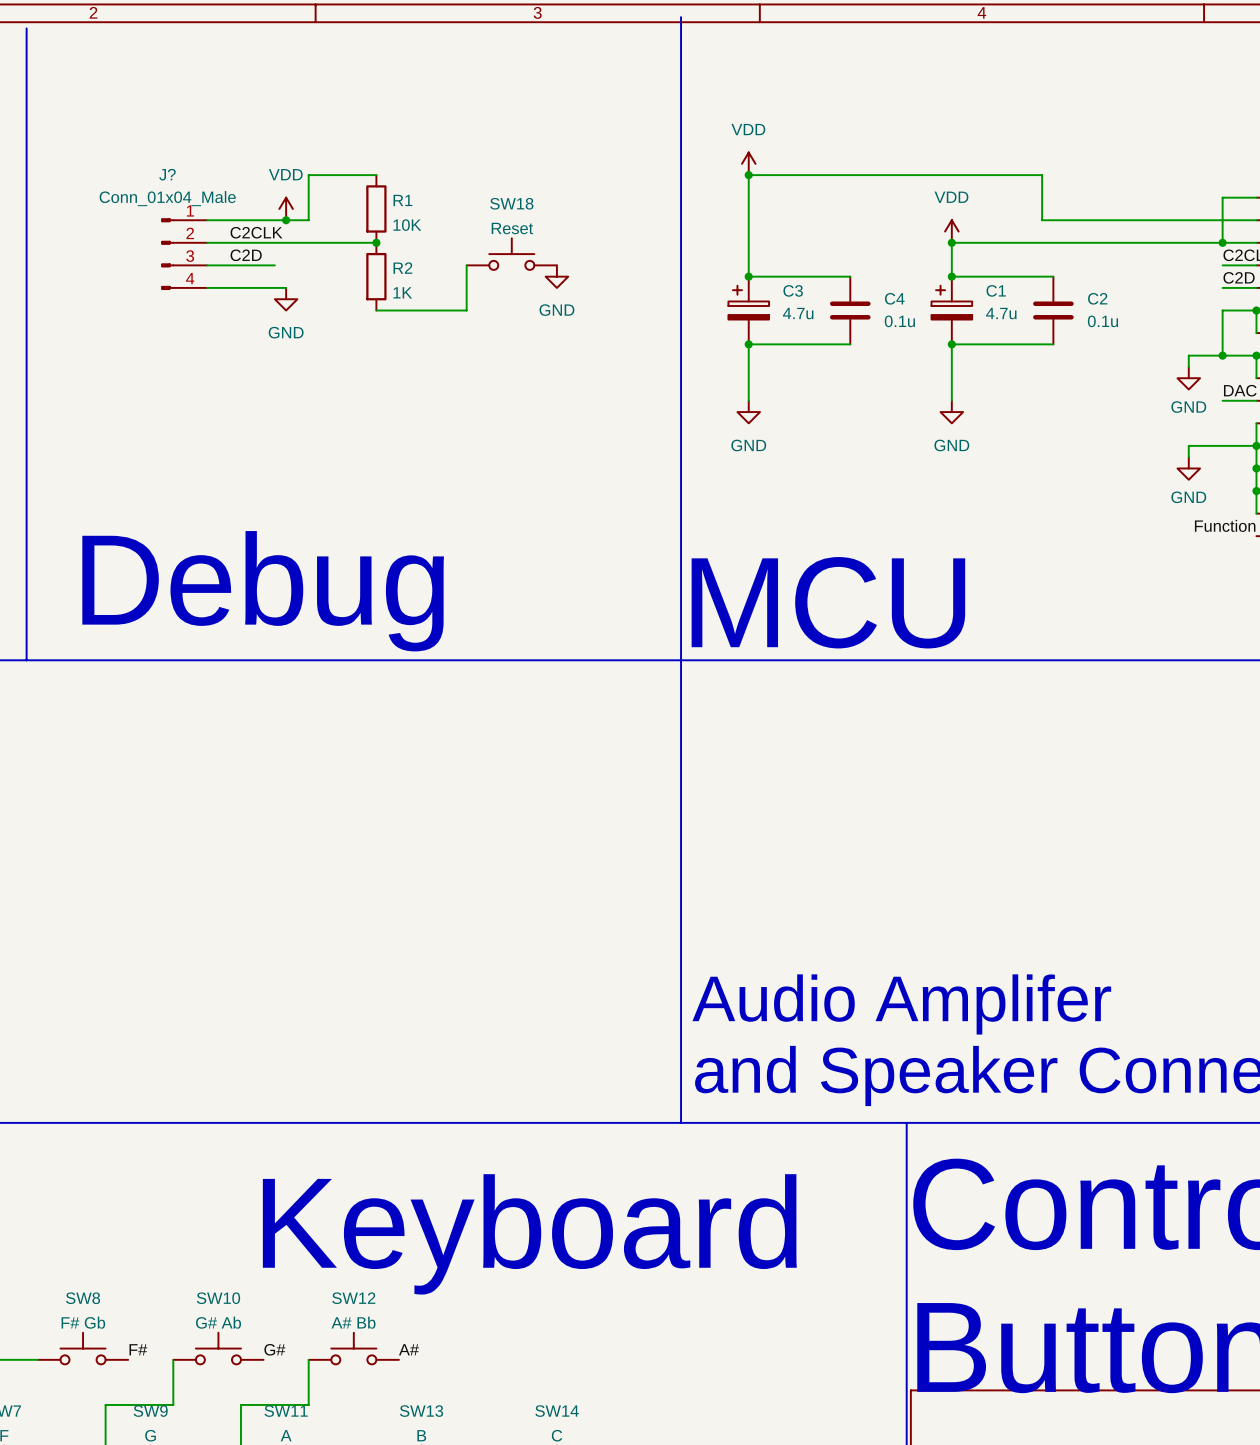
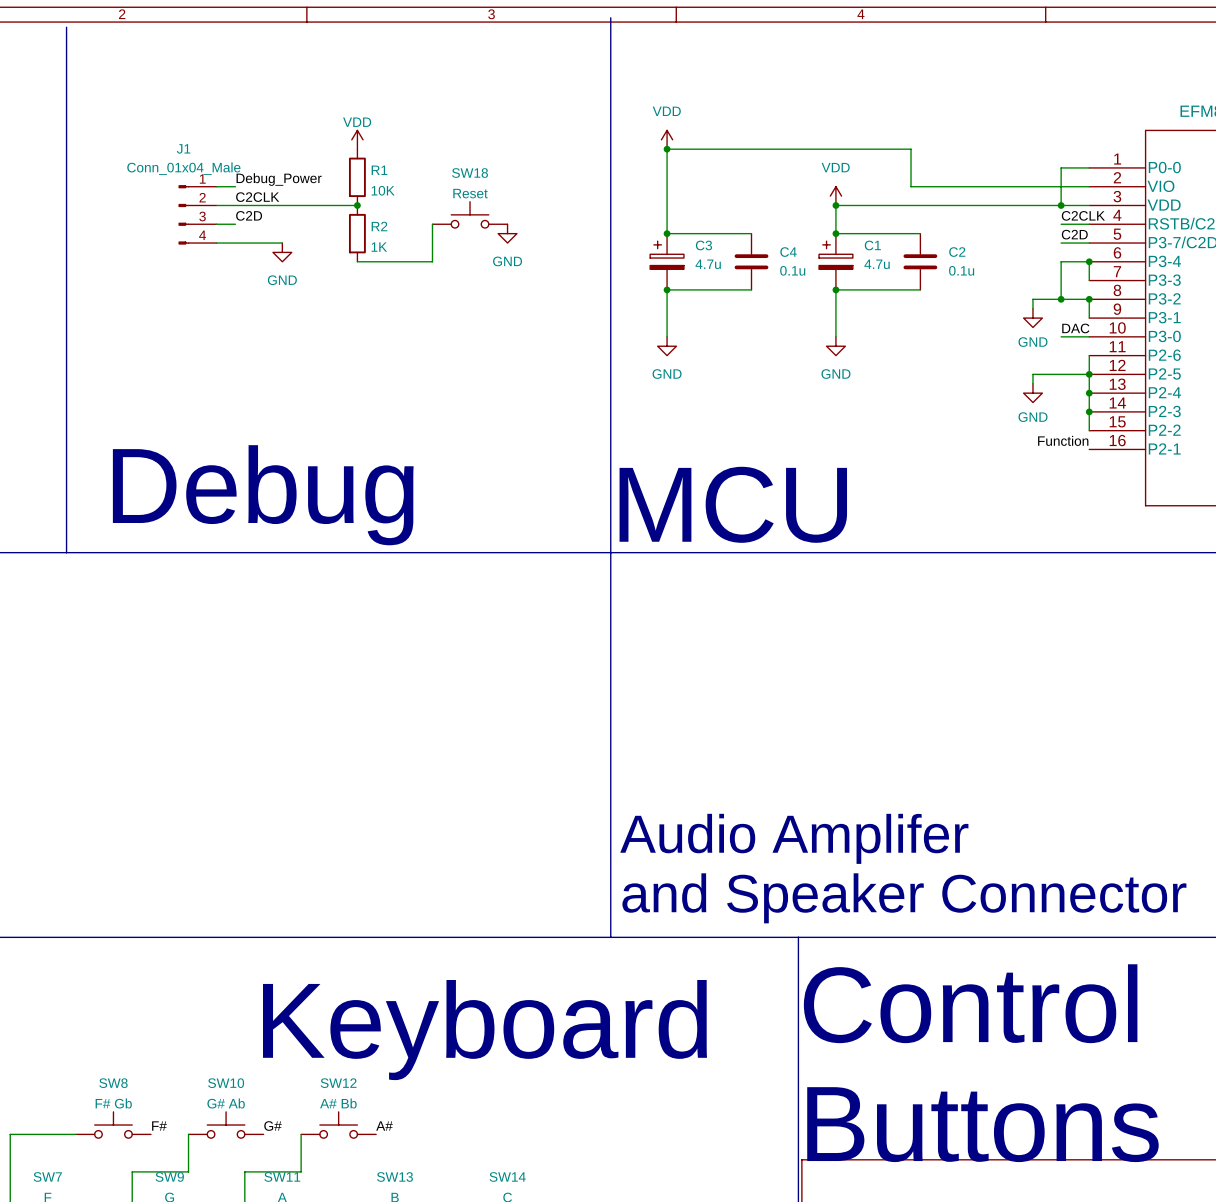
J? name: J? (167, 174) -> J1 (183, 148)
power symbol text position: VDD (285, 174) -> VDD (357, 122)
wire: (376, 175) (308, 175) (308, 220) (229, 220) -> none
power symbol position: VDD (286, 208) -> VDD (357, 139)
label: none -> Debug_Power (279, 179)
junction: (286, 220) -> none
wire: (229, 265) (274, 265) -> none

